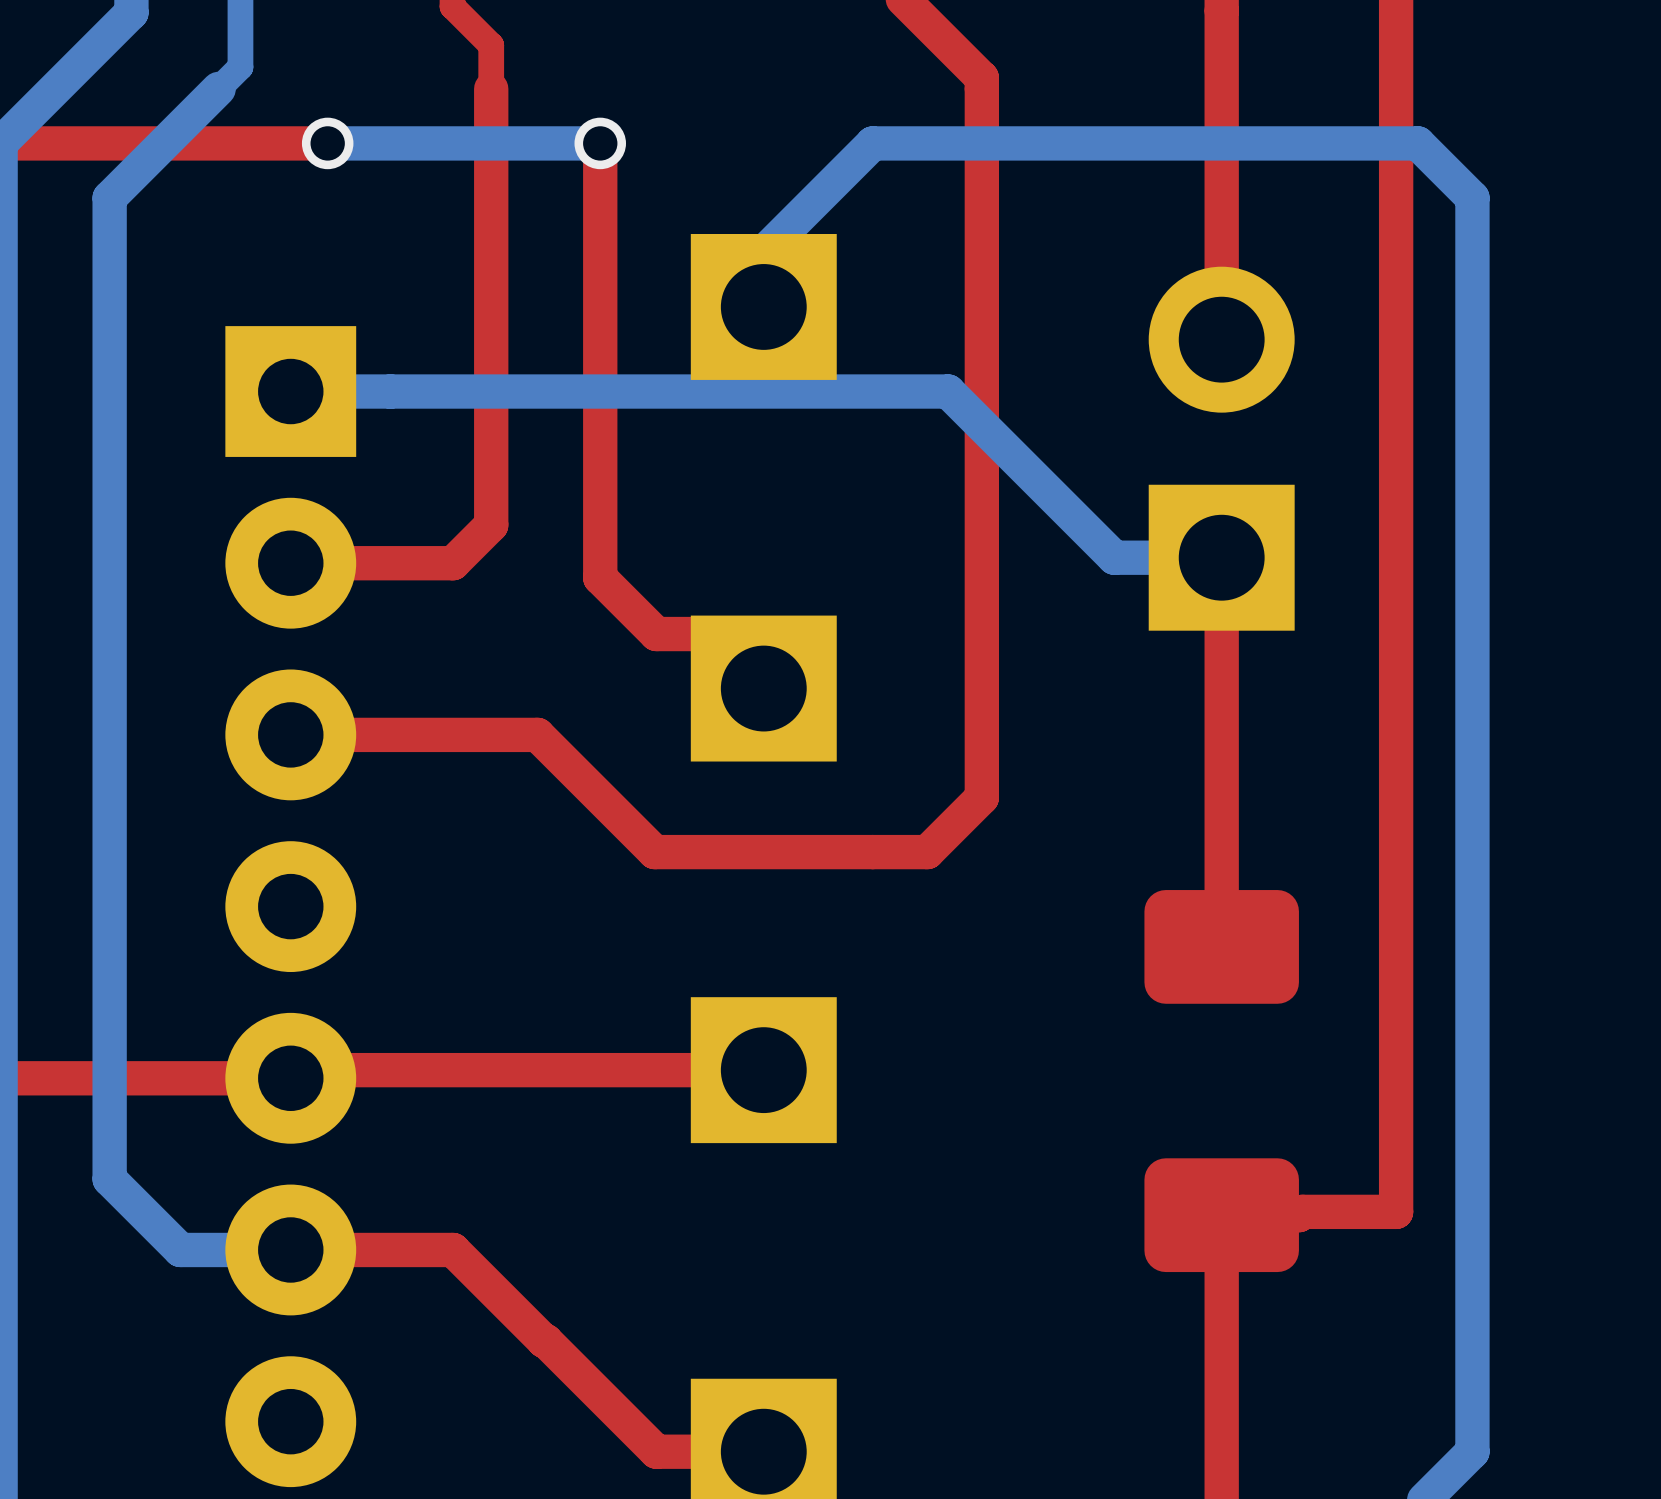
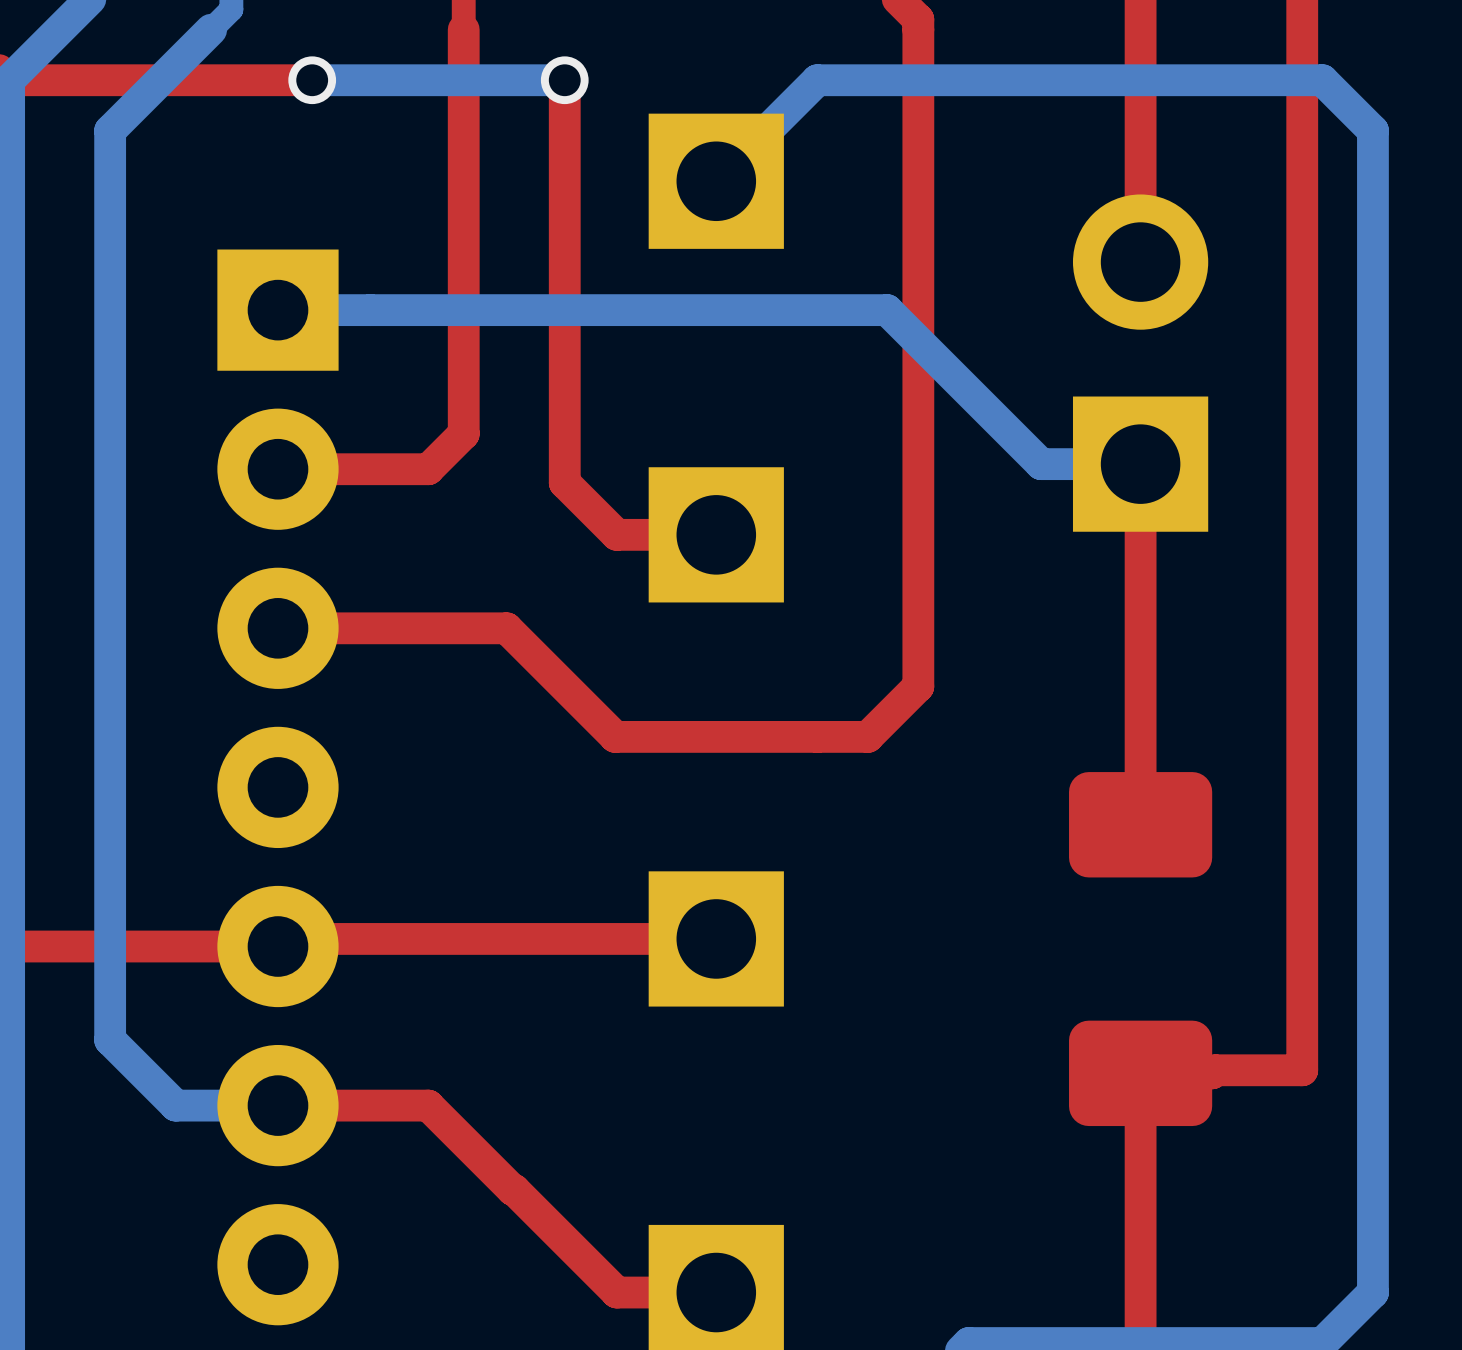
part position: (763, 306) -> (716, 181)
part position: (763, 688) -> (716, 534)

